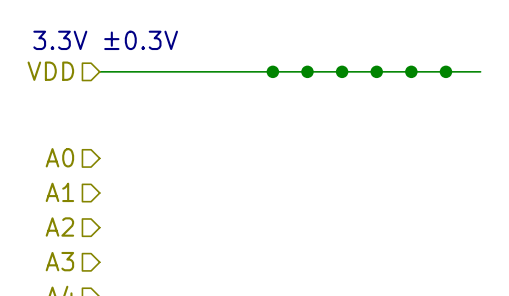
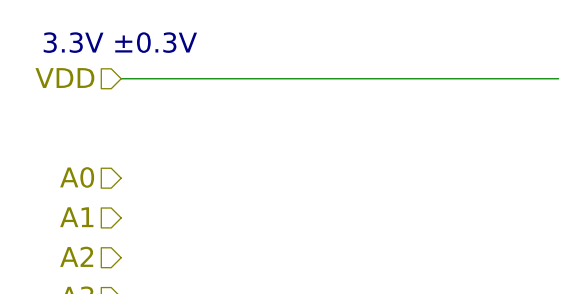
junction: (272, 71) -> none
junction: (307, 71) -> none
junction: (342, 71) -> none
junction: (376, 71) -> none
junction: (411, 71) -> none
junction: (445, 71) -> none

